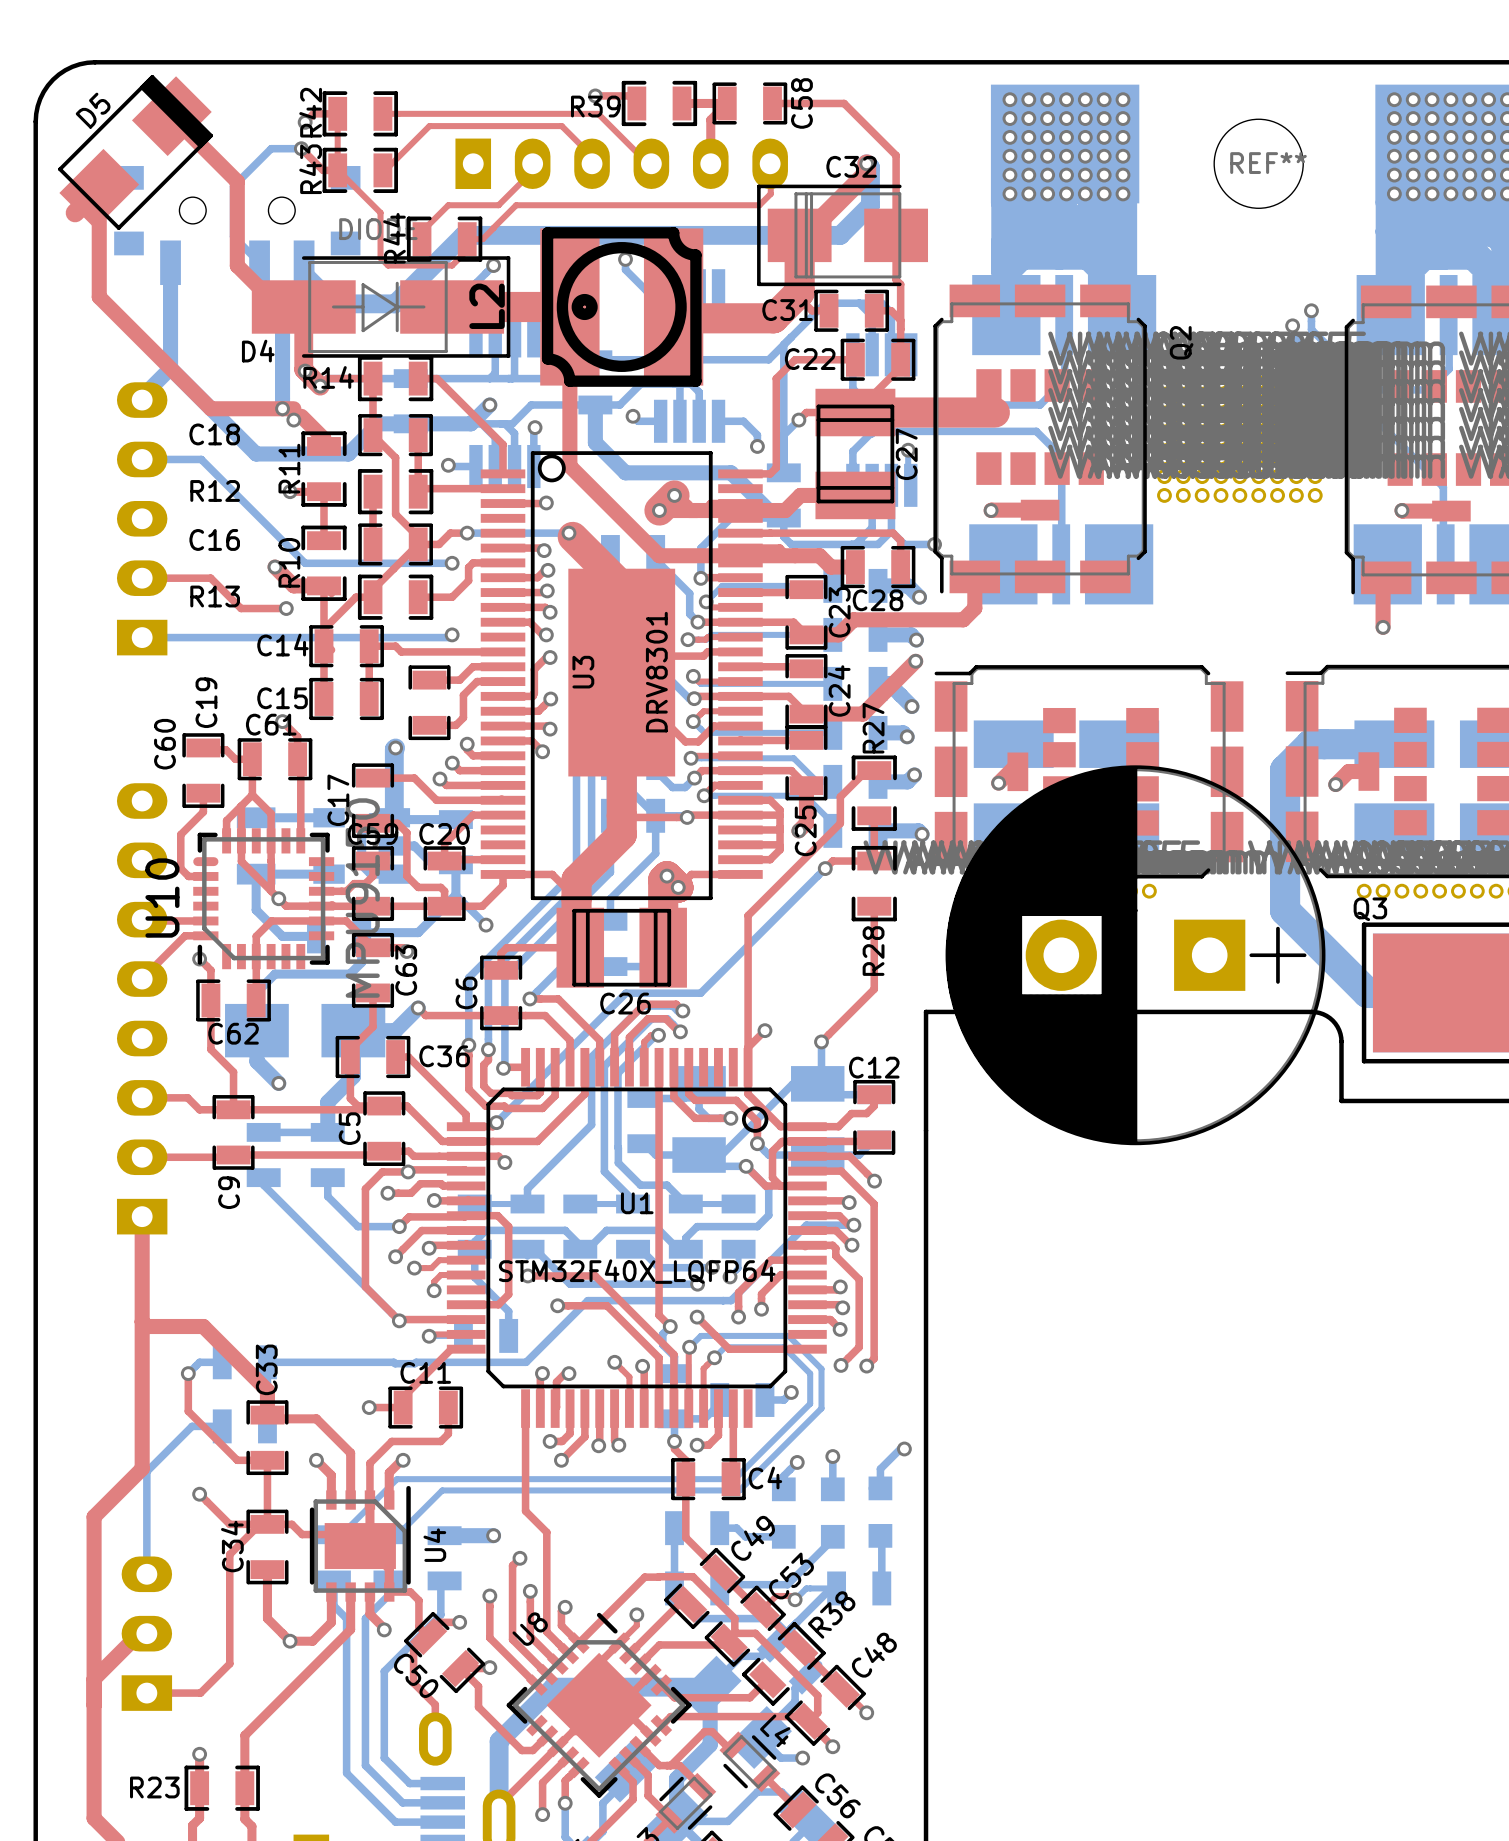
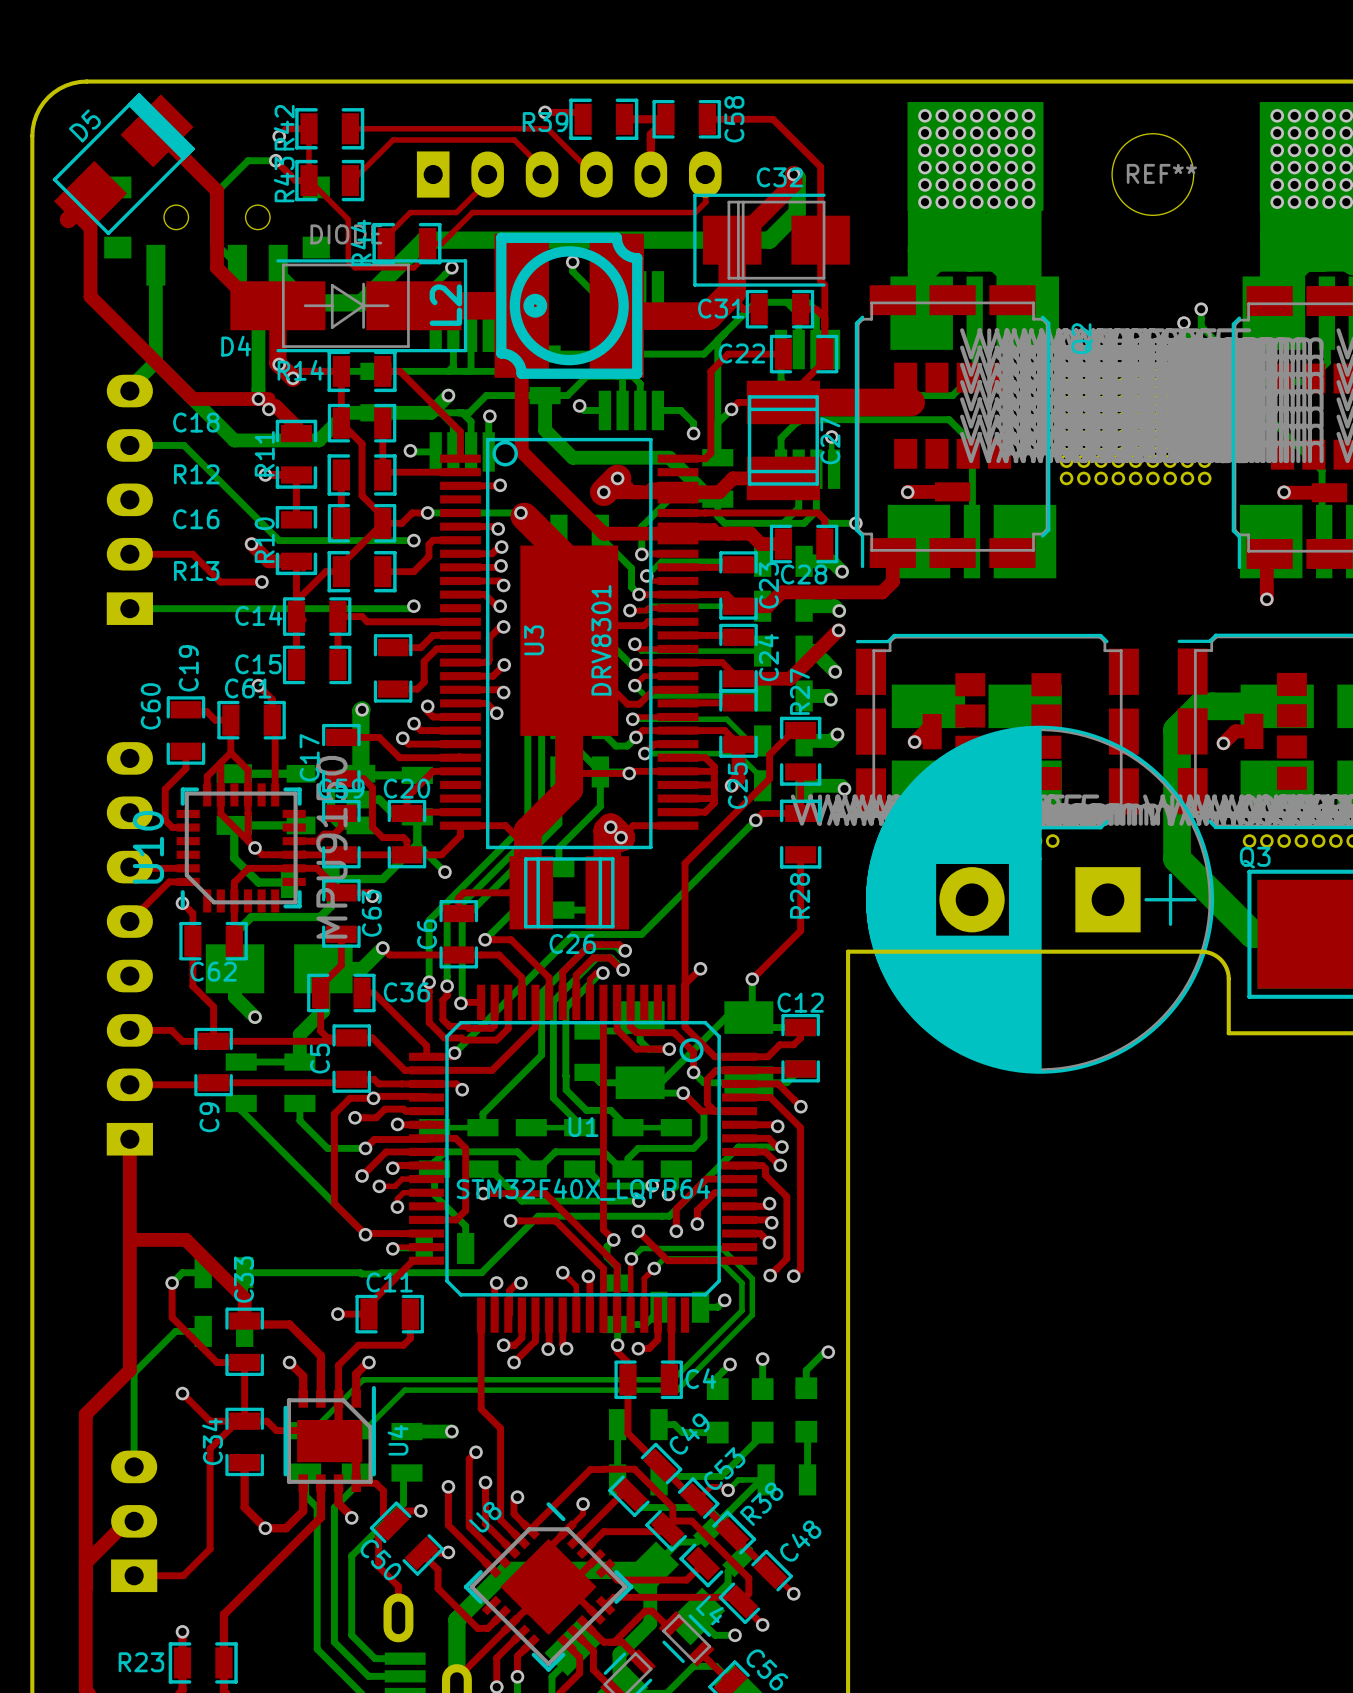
U10 footprint: [193, 828, 335, 970] -> [176, 783, 306, 913]

